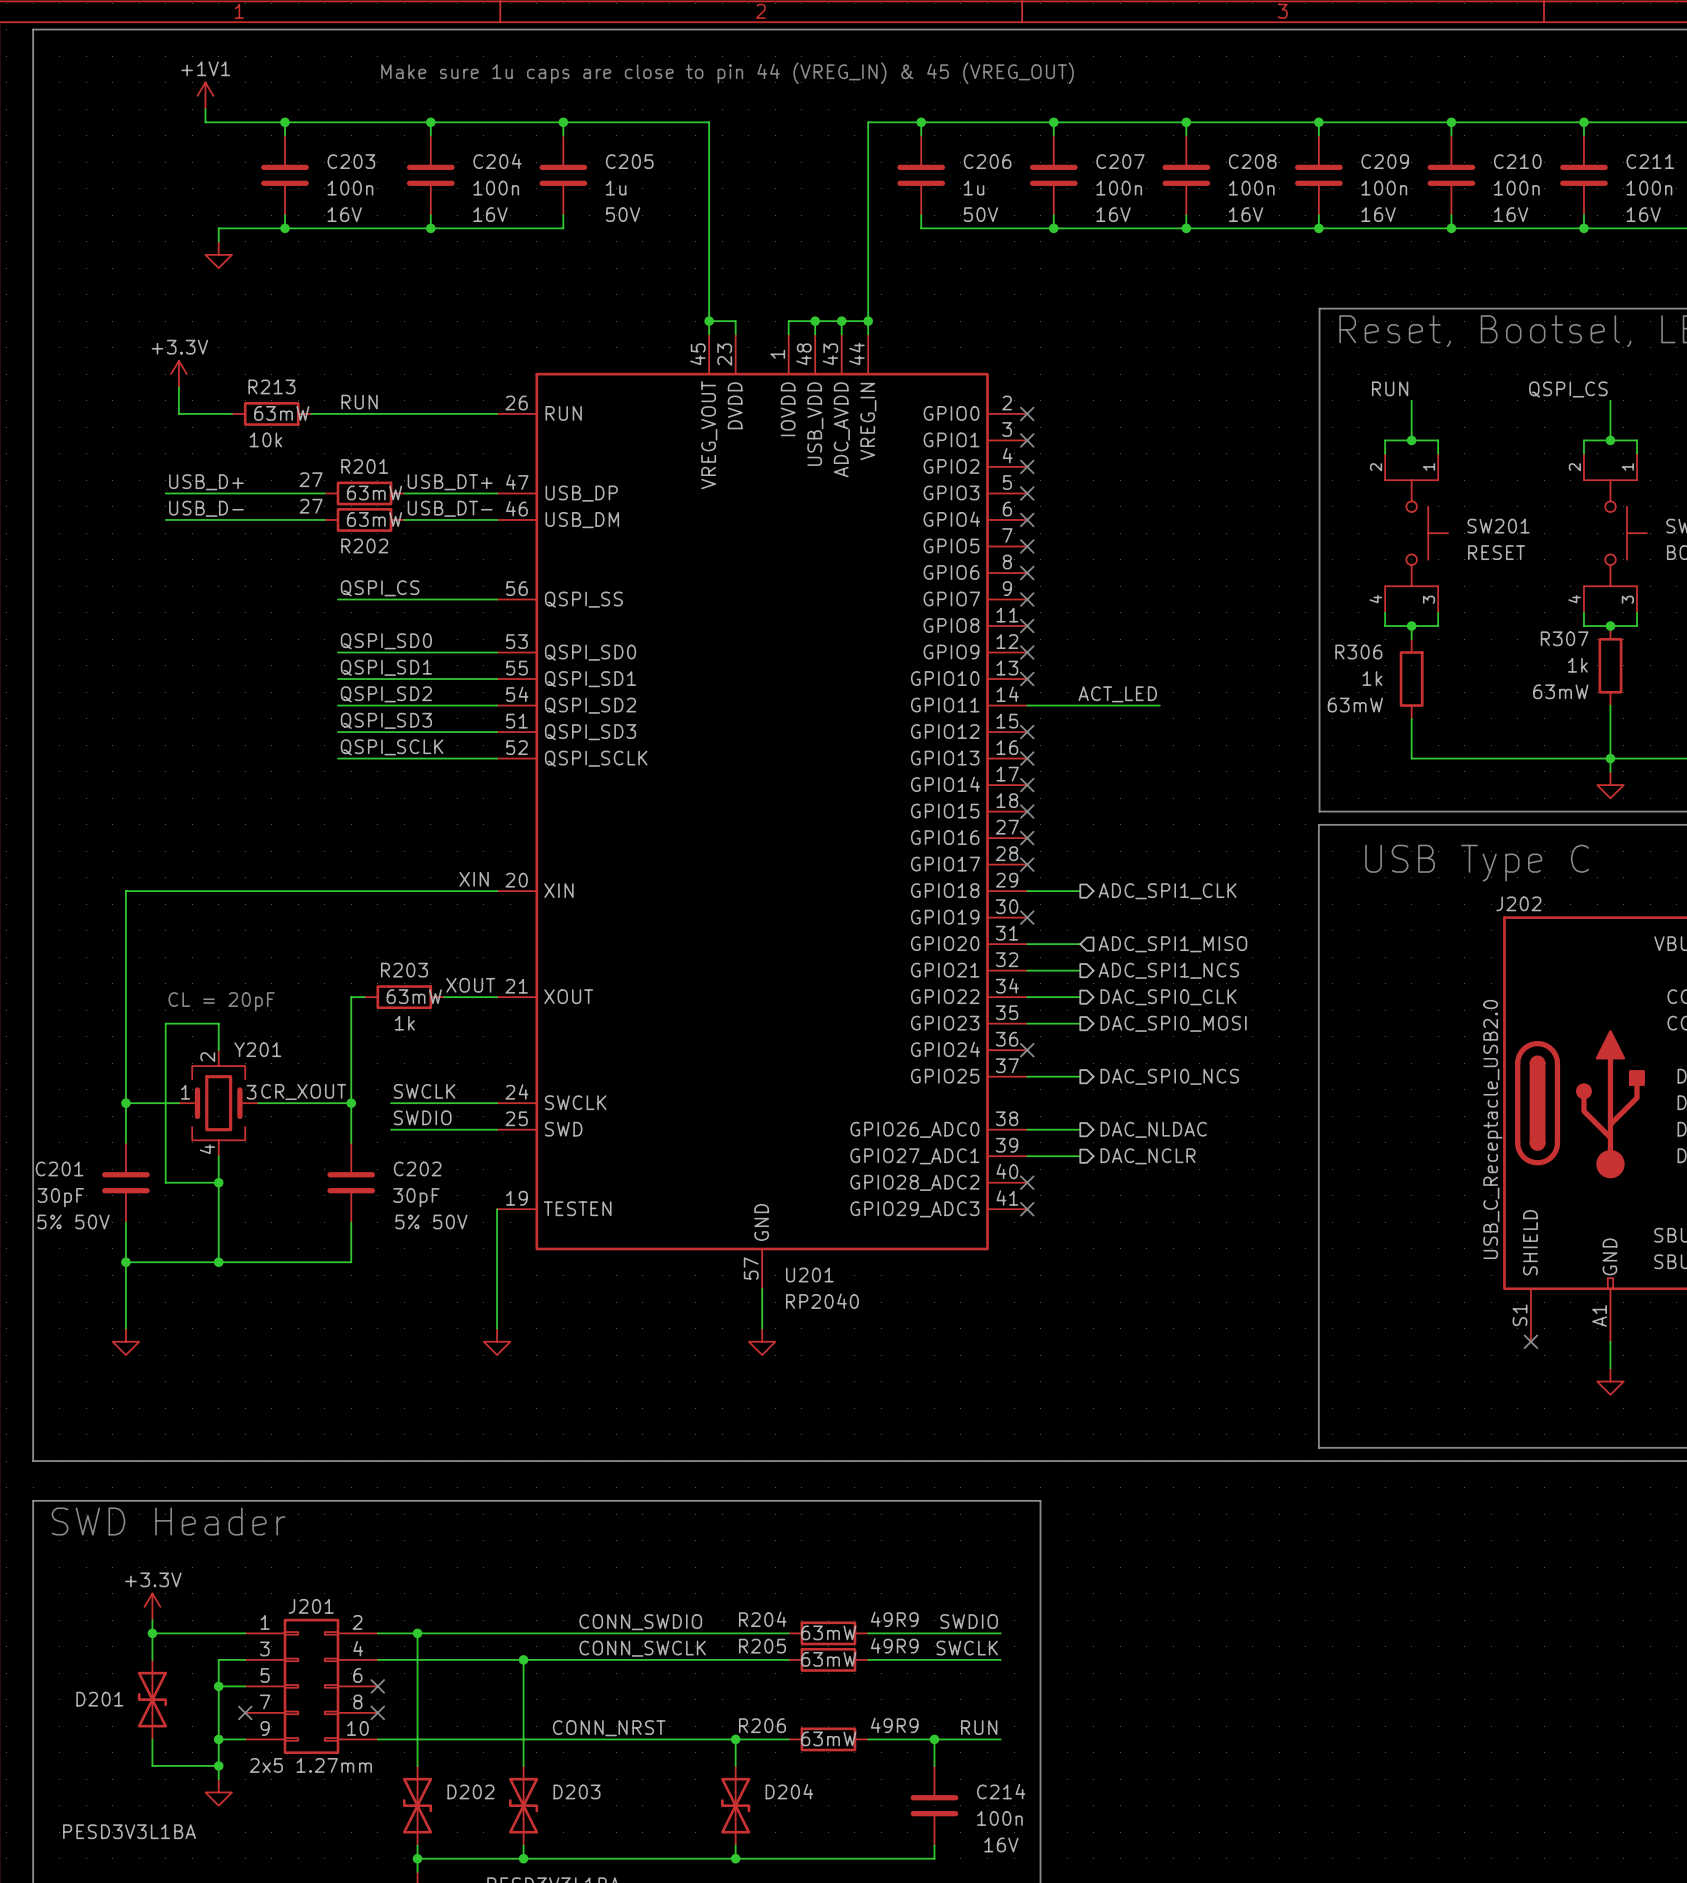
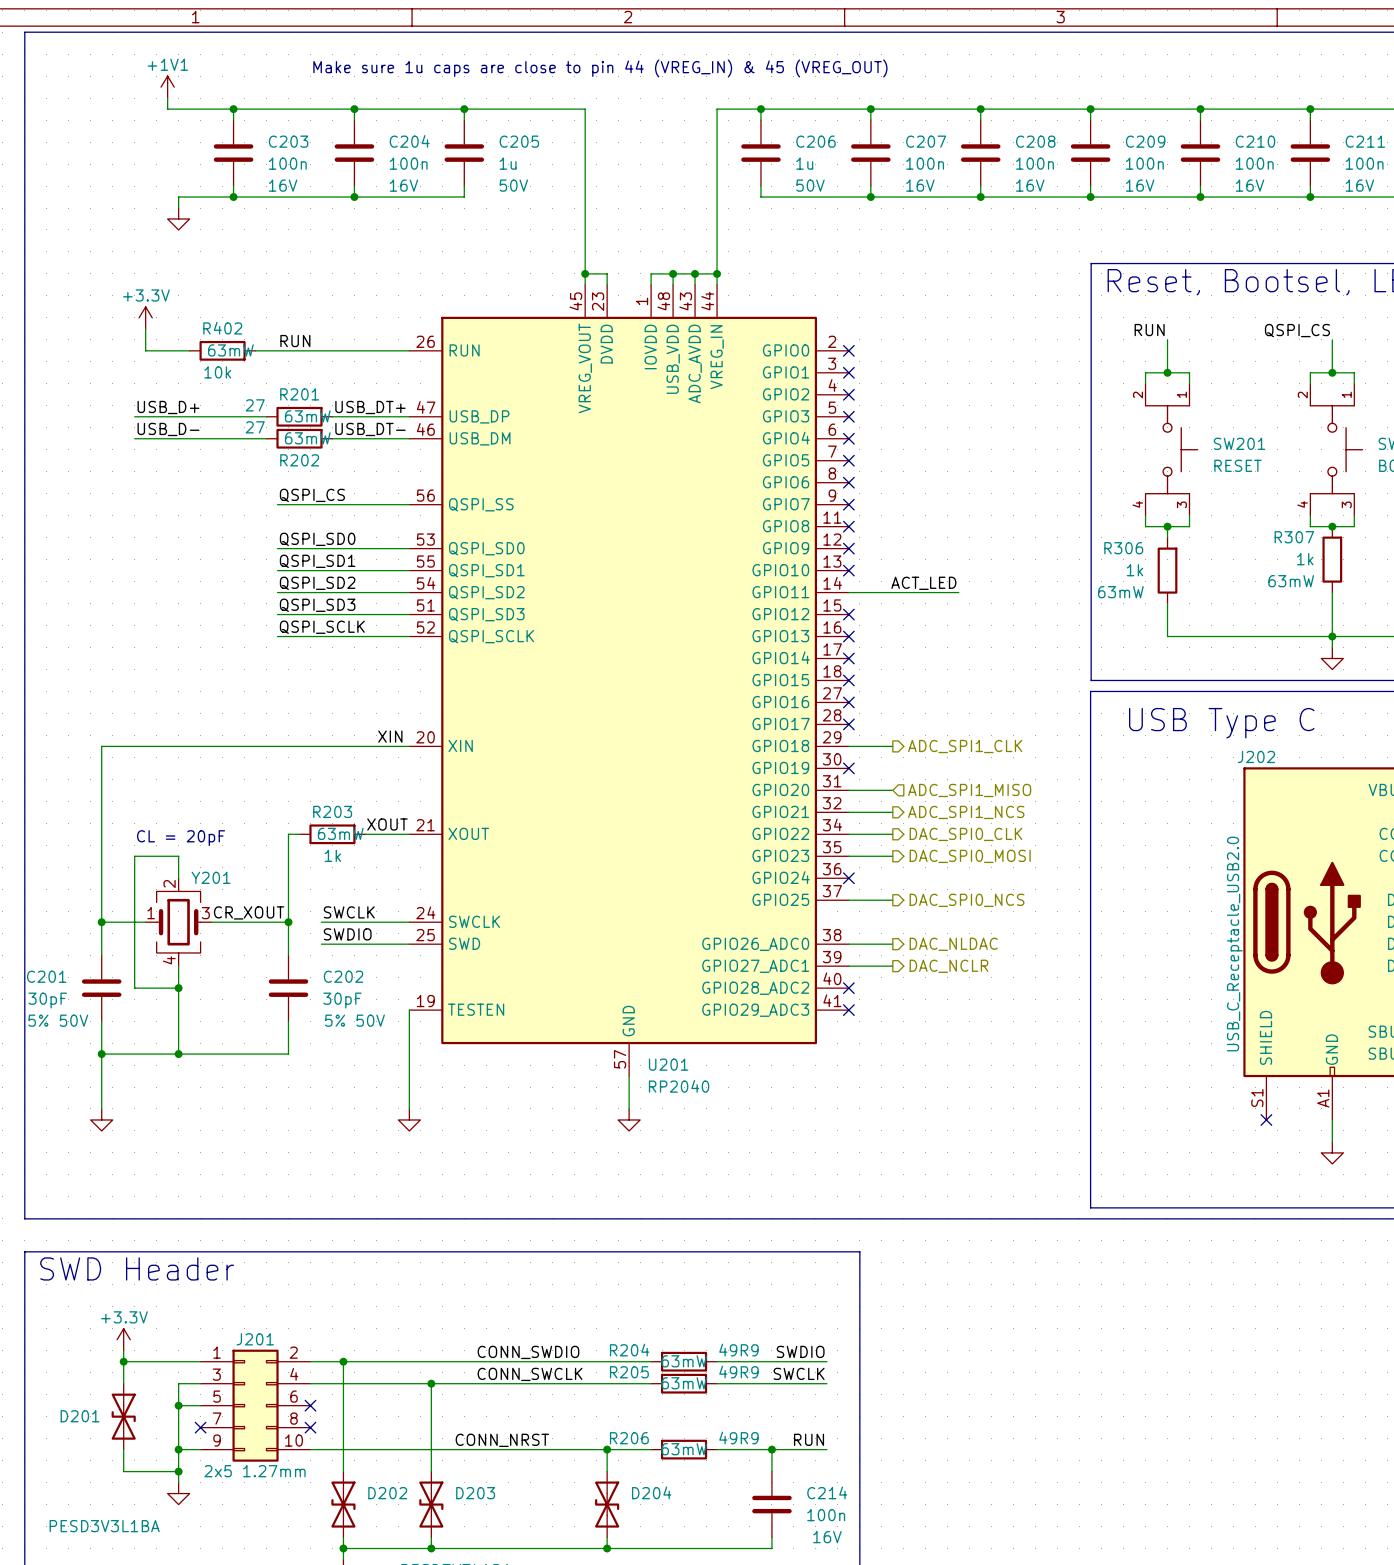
R213 name: R213 (271, 386) -> R402 (222, 328)

